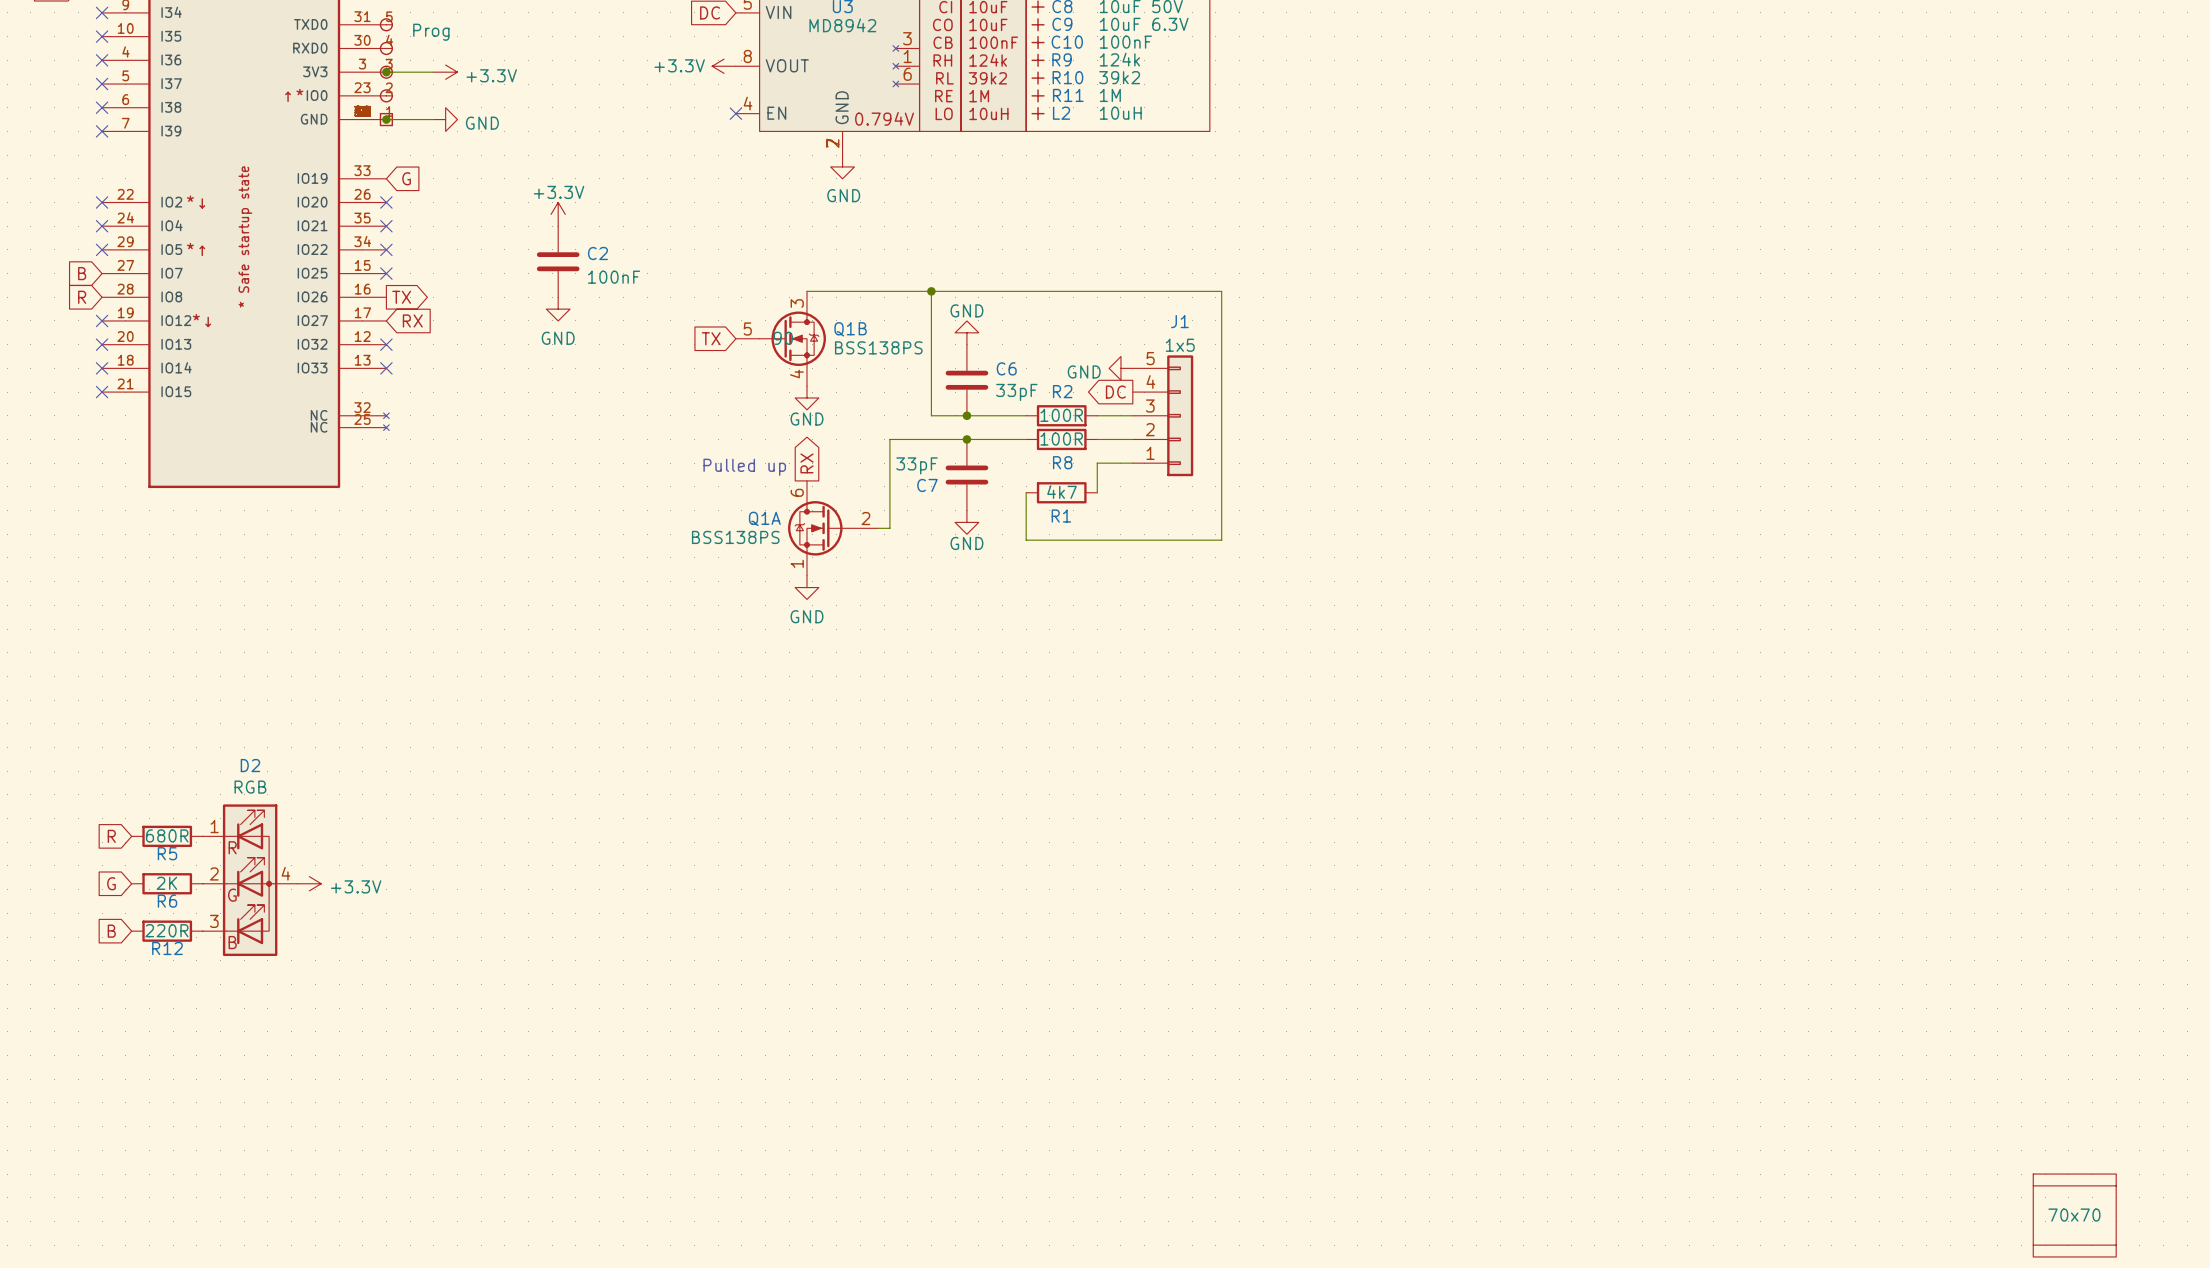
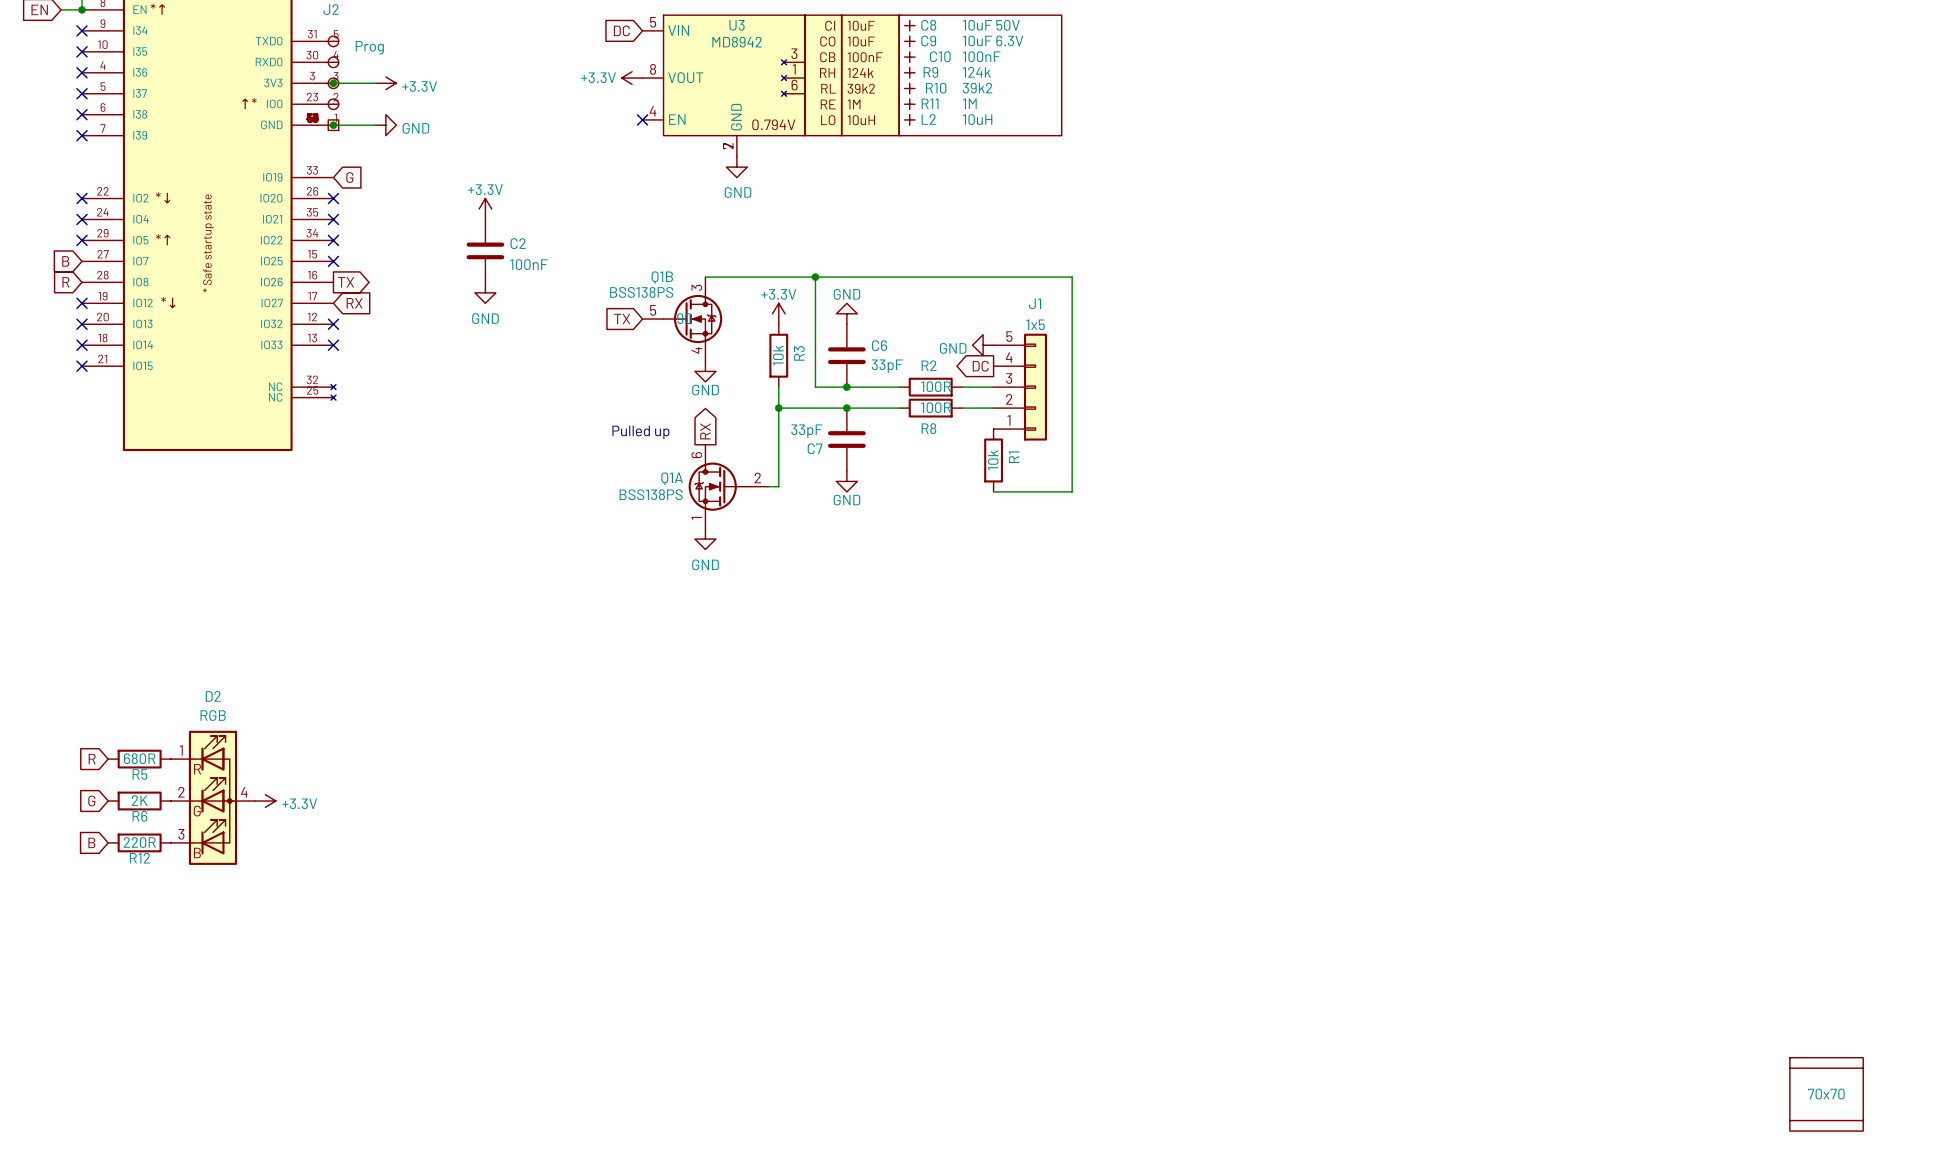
Q1B name position: Q1B (850, 329) -> Q1B (662, 277)
power symbol: none -> +3.3V (778, 313)
Q1B value position: BSS138PS (878, 347) -> BSS138PS (641, 292)
R3: none -> 10k (778, 355)
wire: none -> (778, 387) (778, 408)
junction: none -> (778, 408)
wire: (1132, 463) (1097, 463) (1097, 492) -> none
wire: (1026, 492) (1026, 540) (1221, 540) (1221, 534) -> (993, 491) (1072, 491)
R1 rotation: 0° (1061, 492) -> 90° clockwise (993, 460)
R1 position: (1061, 492) -> (993, 460)
R1 value: 4k7 (1062, 492) -> 10k (993, 460)
R1 name position: R1 (1061, 516) -> R1 (1014, 457)

